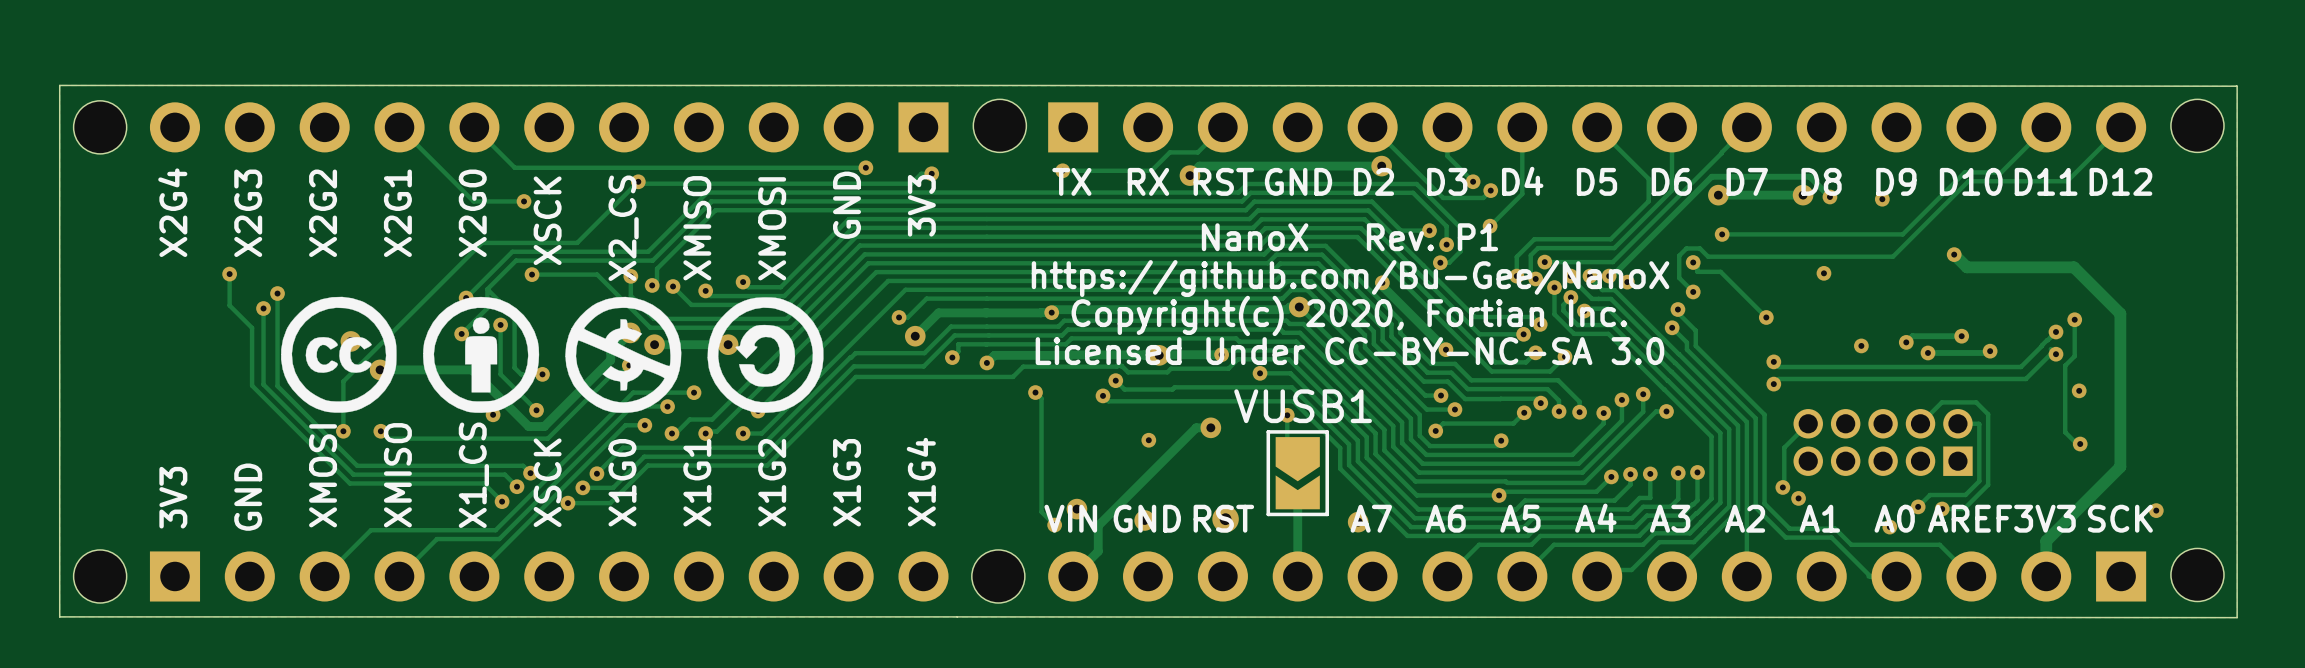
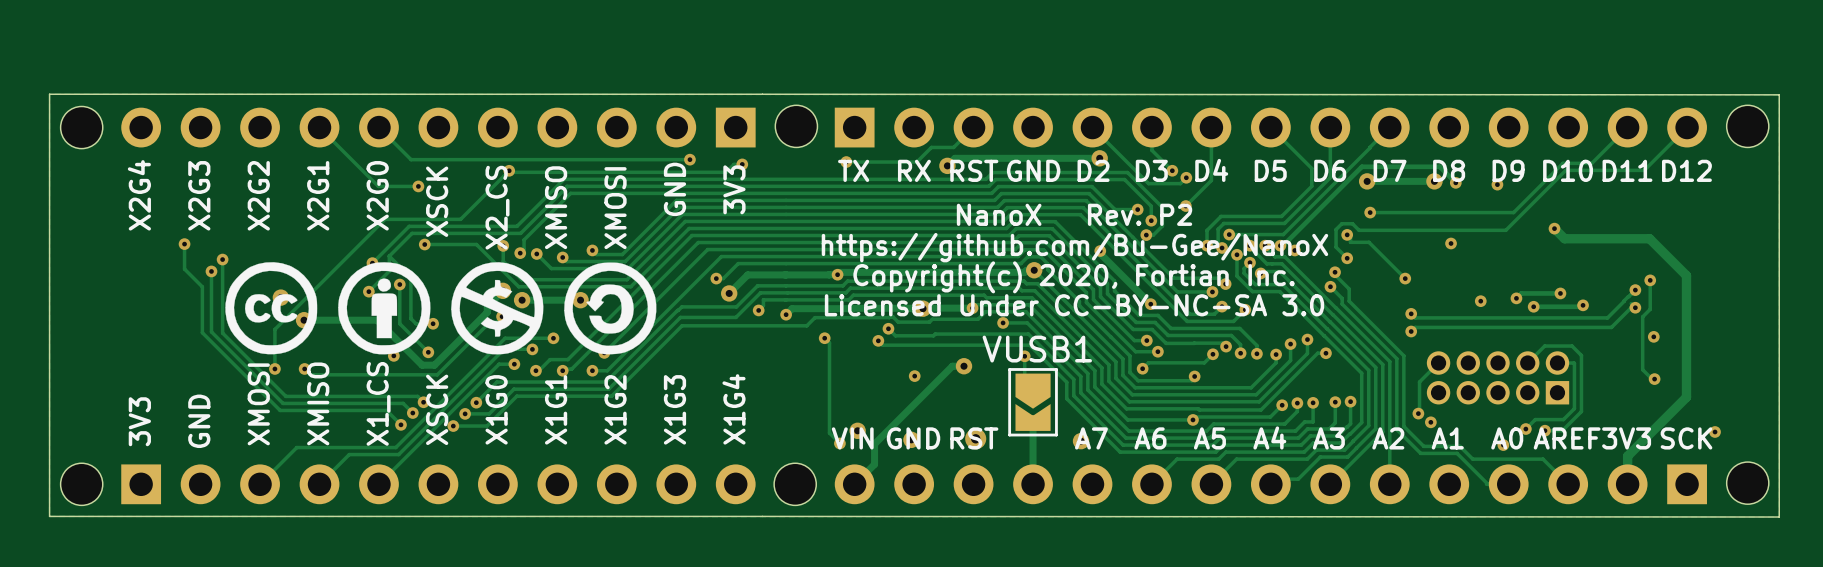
text: NanoX Rev. P1 (1349, 237) -> NanoX Rev. P2 (1074, 214)

